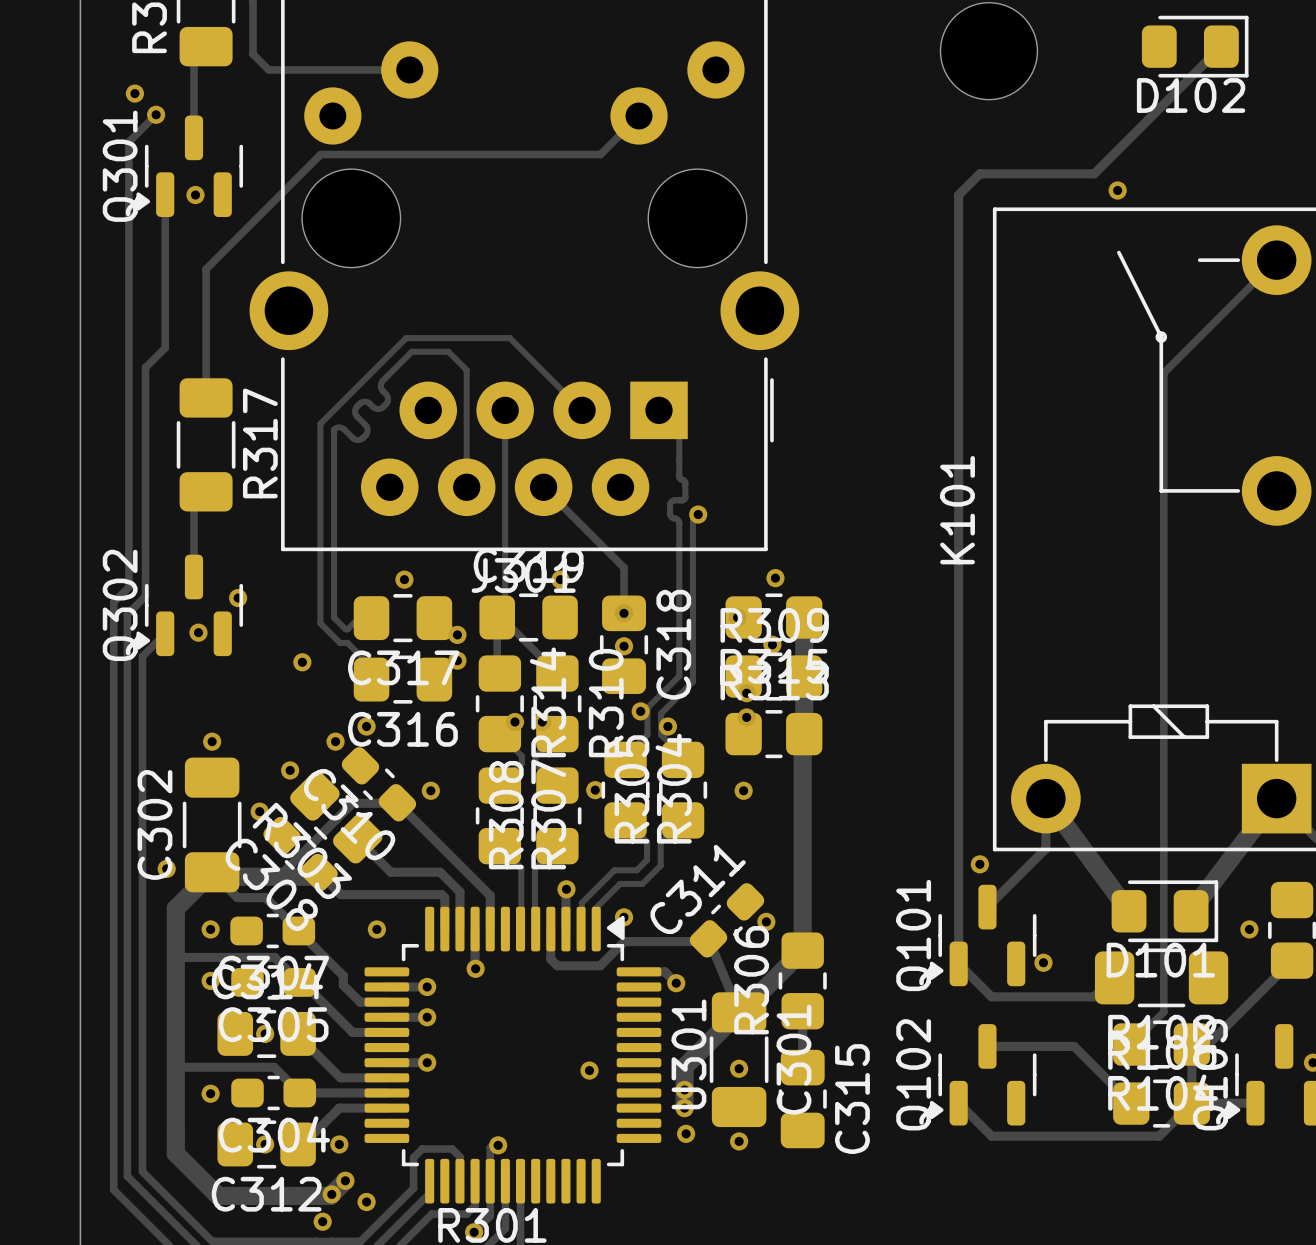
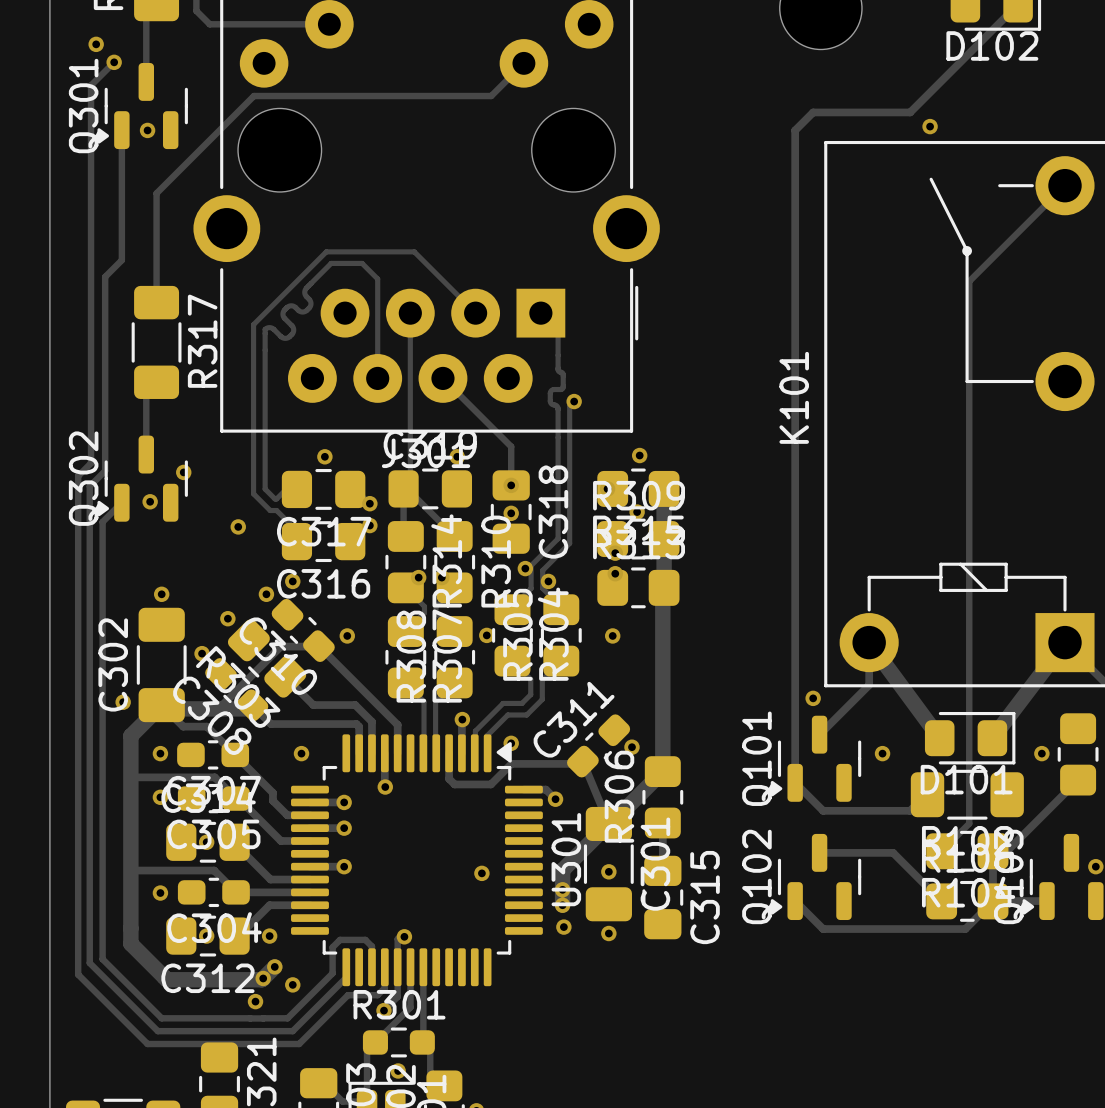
via position: (1043, 962) -> (882, 753)

